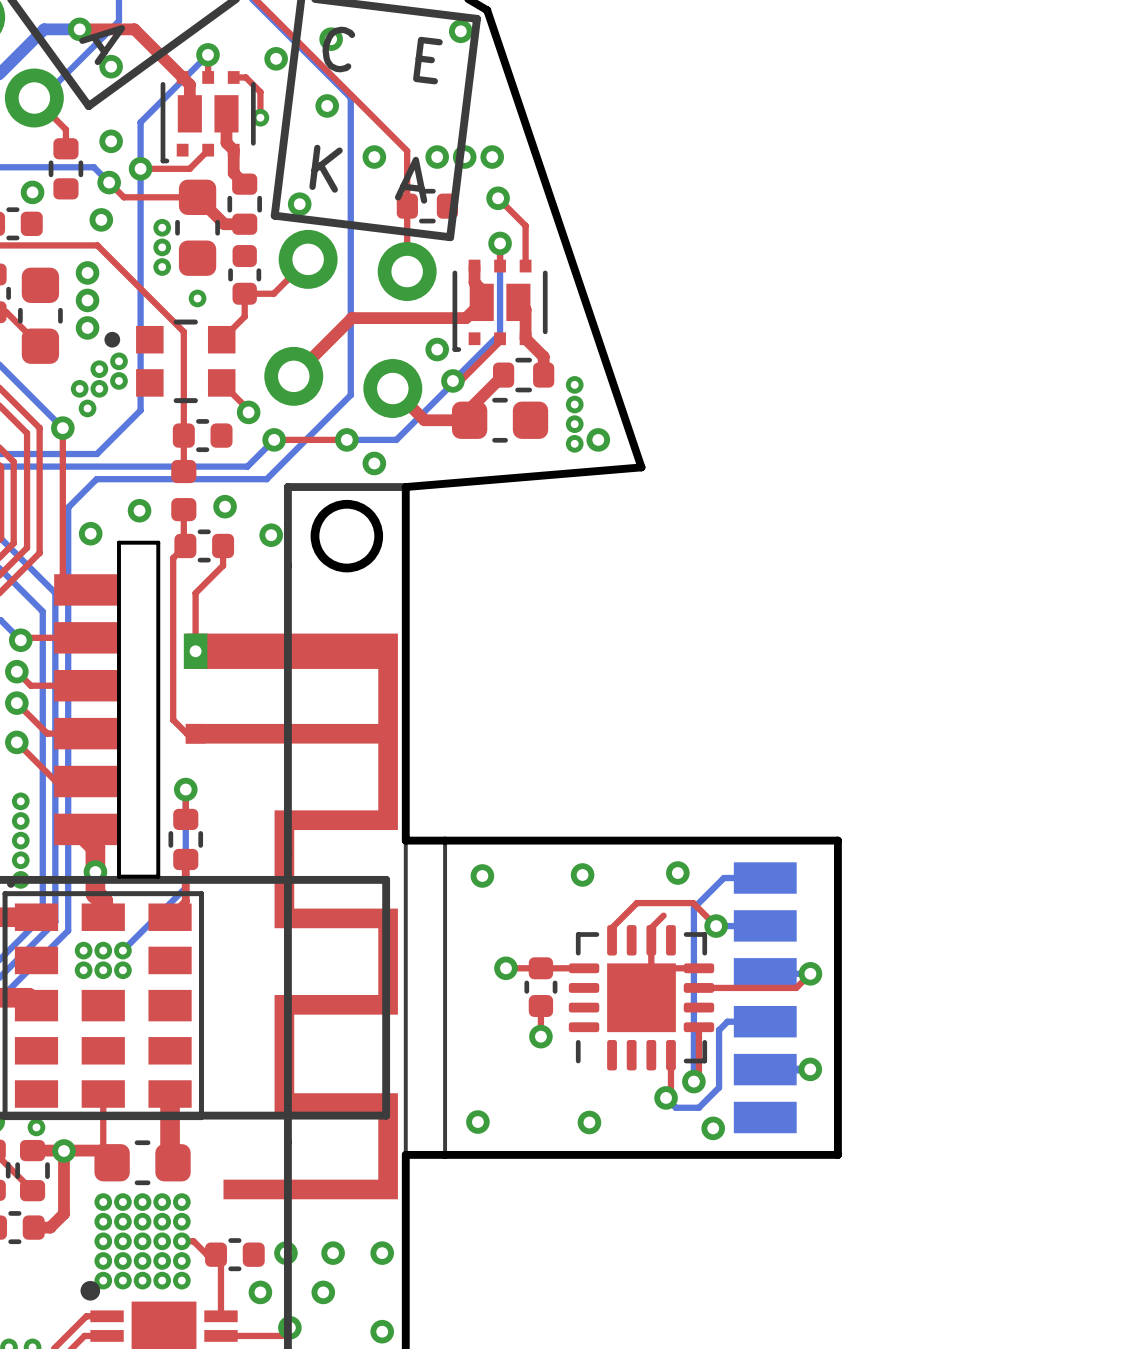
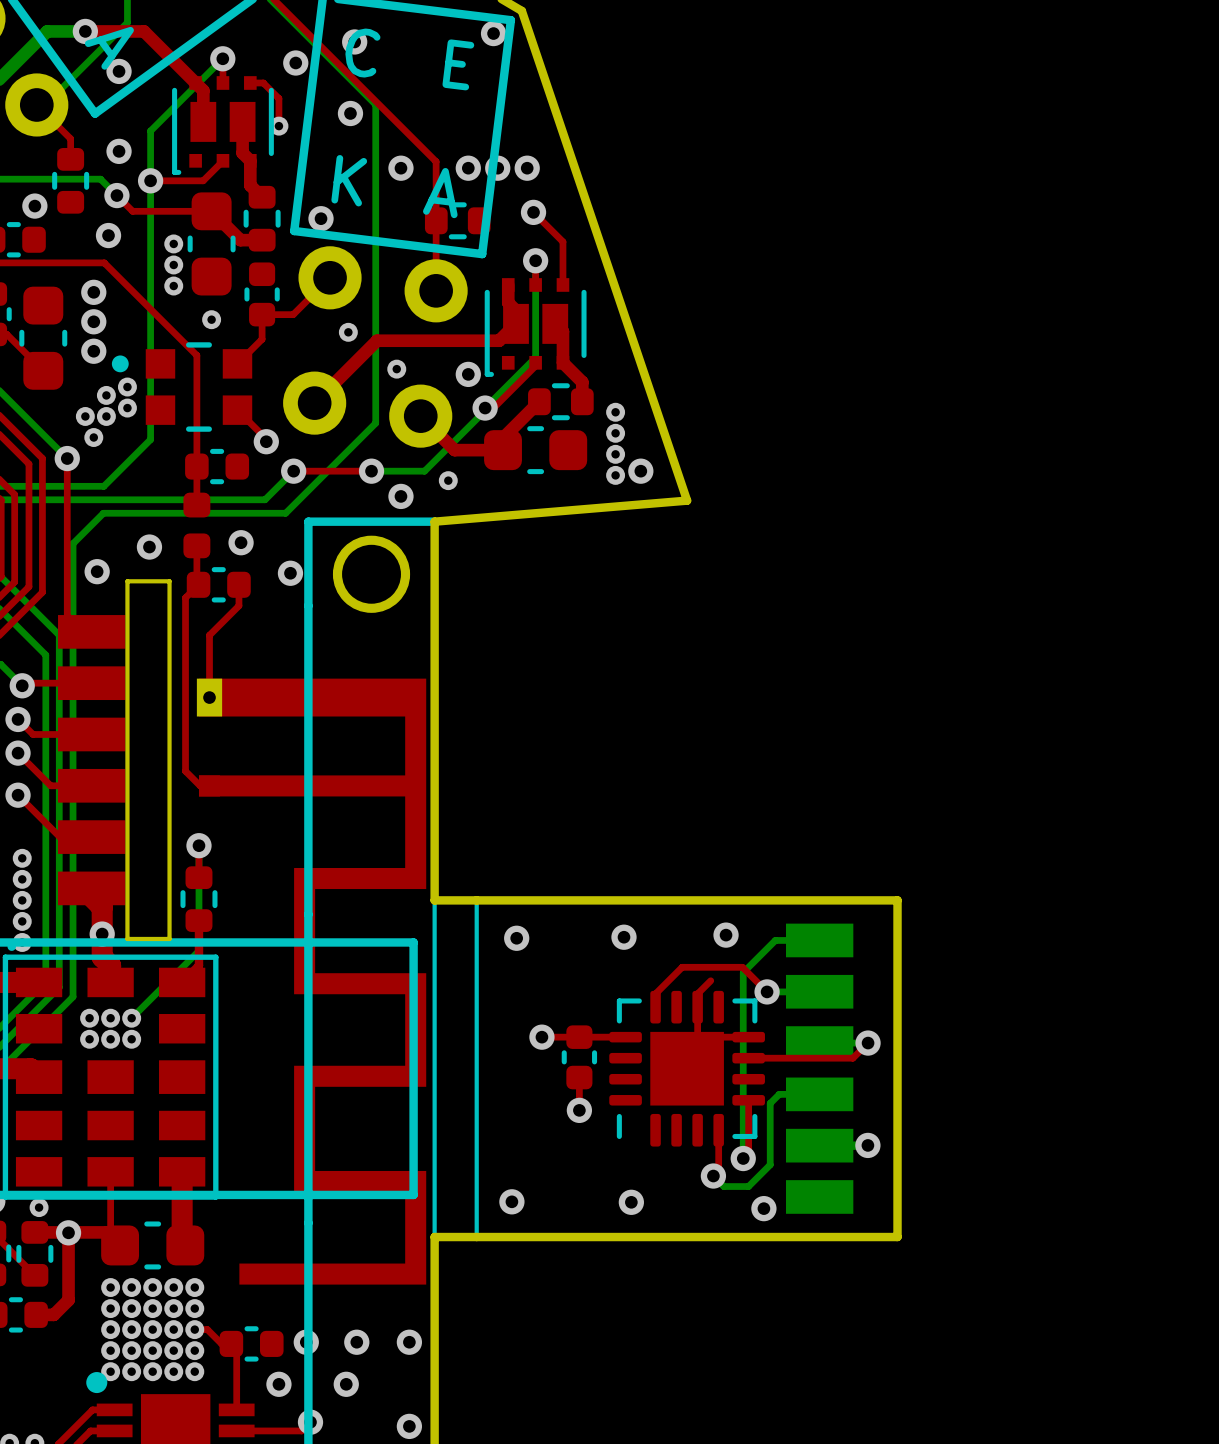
via: none -> (348, 332)
via: none -> (396, 369)
via: none -> (448, 480)

